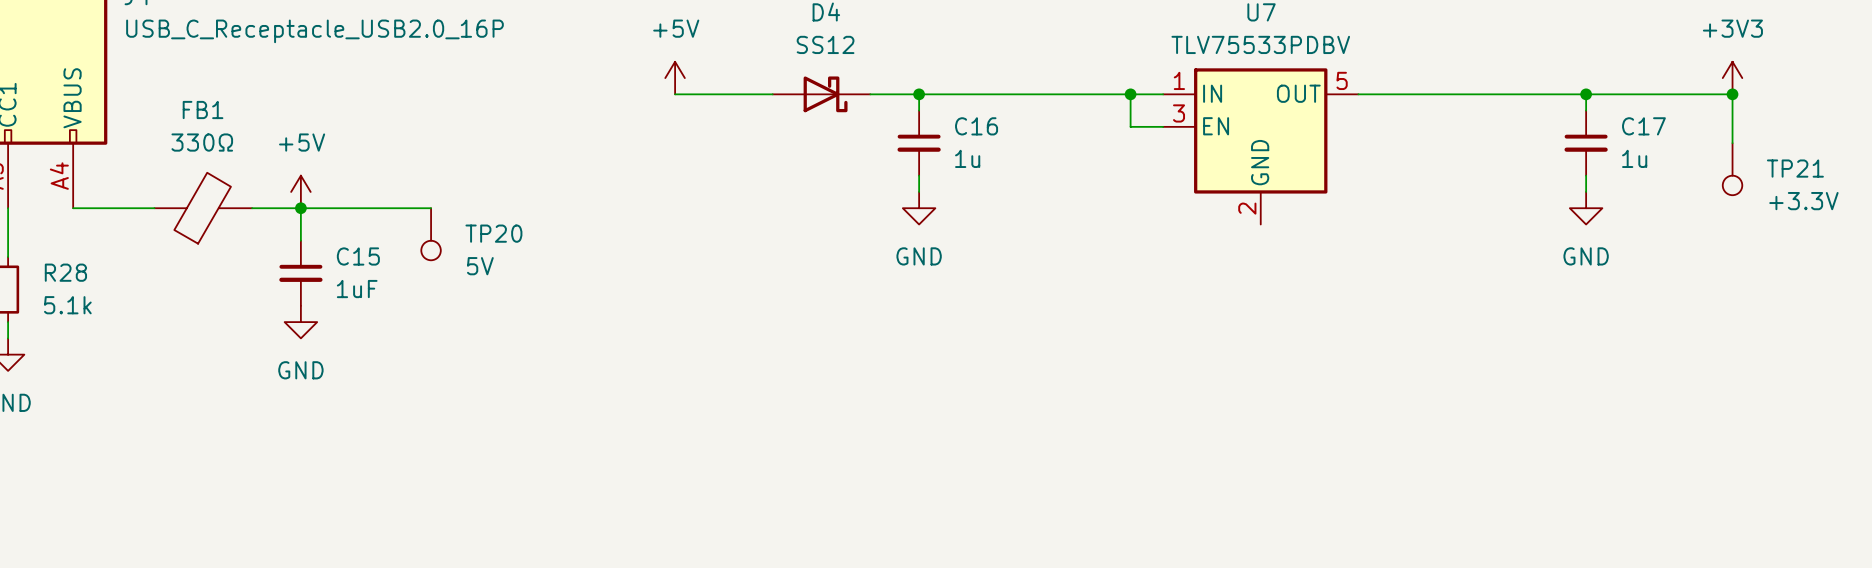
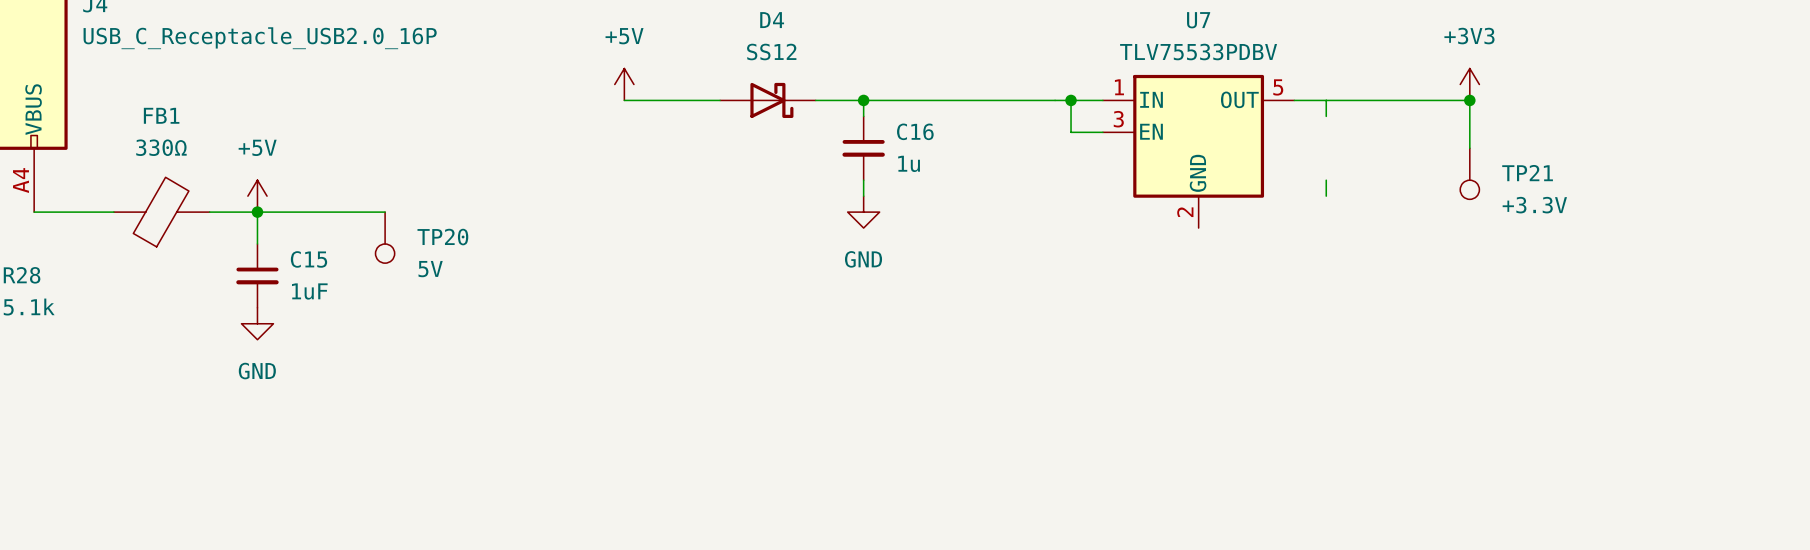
power symbol position: +3V3 (1732, 78) -> +3V3 (1469, 84)
wire: (1537, 94) (1732, 94) (1732, 143) -> (1469, 100) (1469, 148)
wire: (1586, 94) (1586, 110) -> (1326, 100) (1326, 116)
junction position: (1586, 94) -> (1469, 100)
junction: (1732, 94) -> none
C17: 1u (1586, 143) -> none
TP21 position: (1732, 169) -> (1469, 173)
wire: (1586, 175) (1586, 191) -> (1326, 180) (1326, 196)
power symbol: GND (1586, 208) -> none

